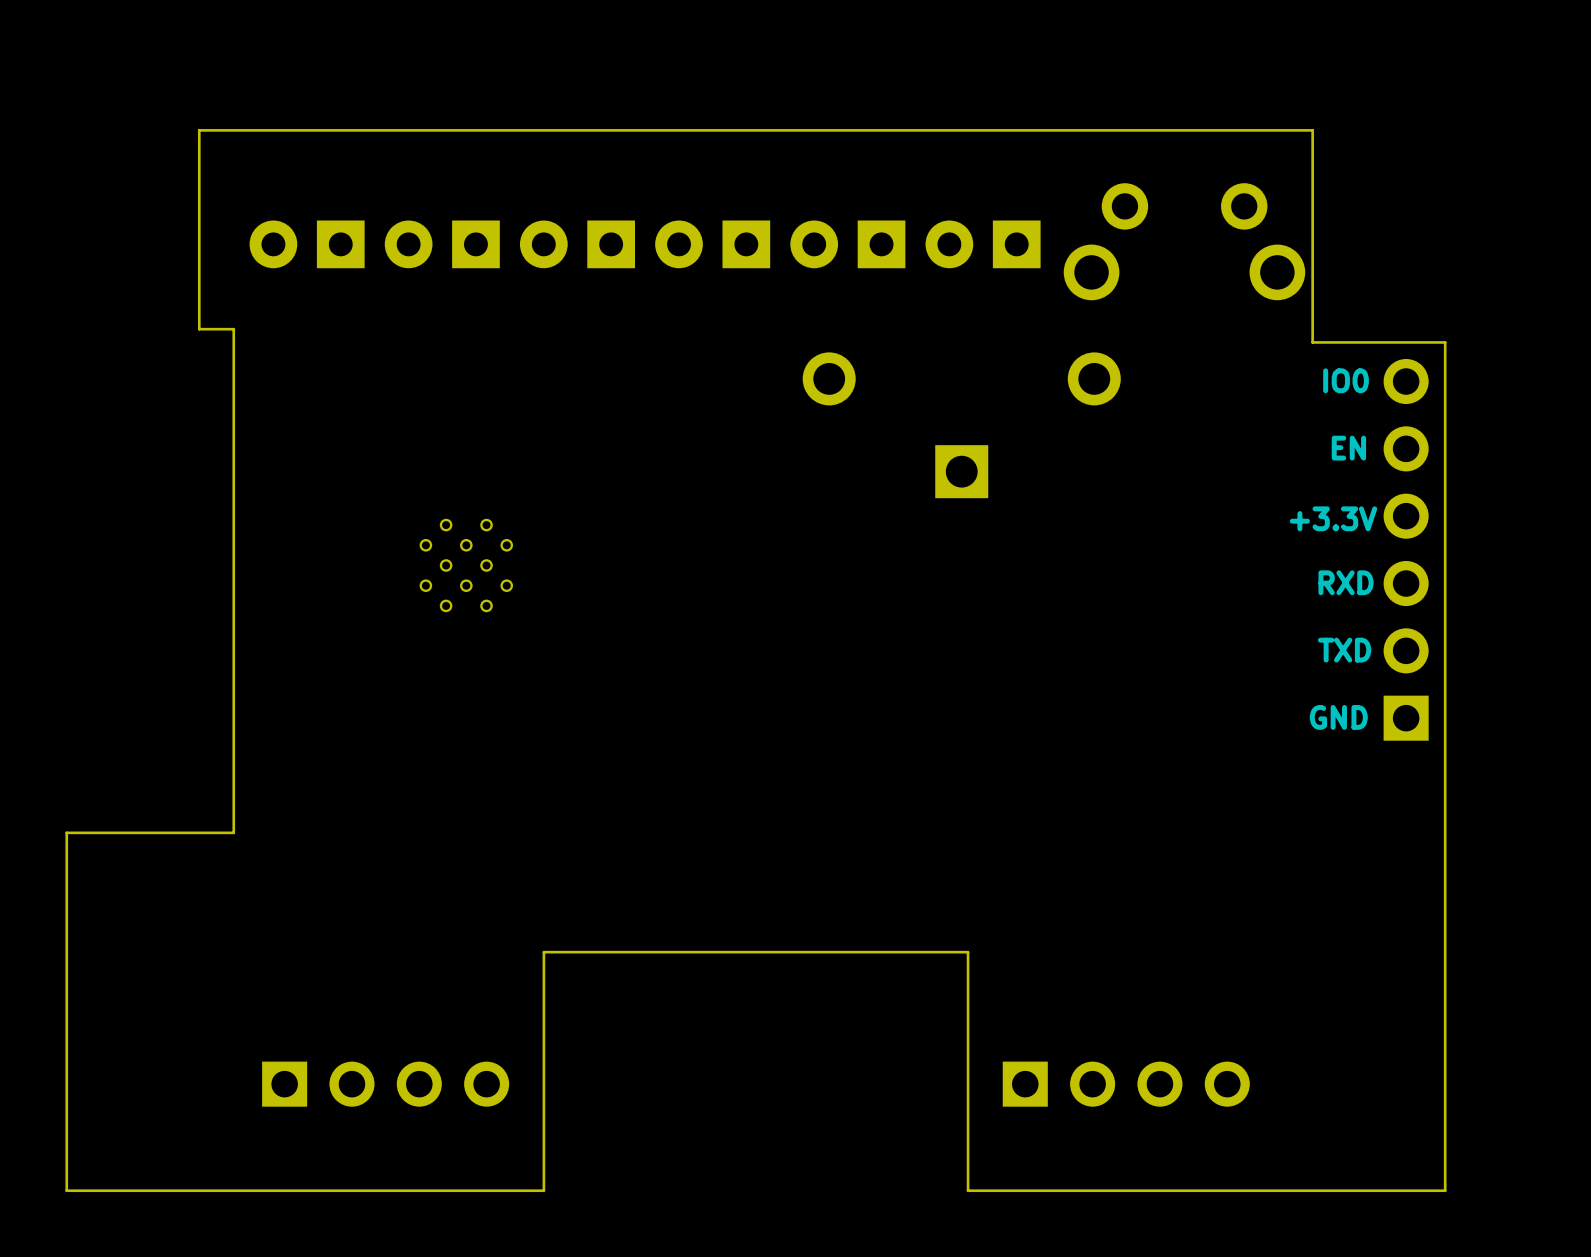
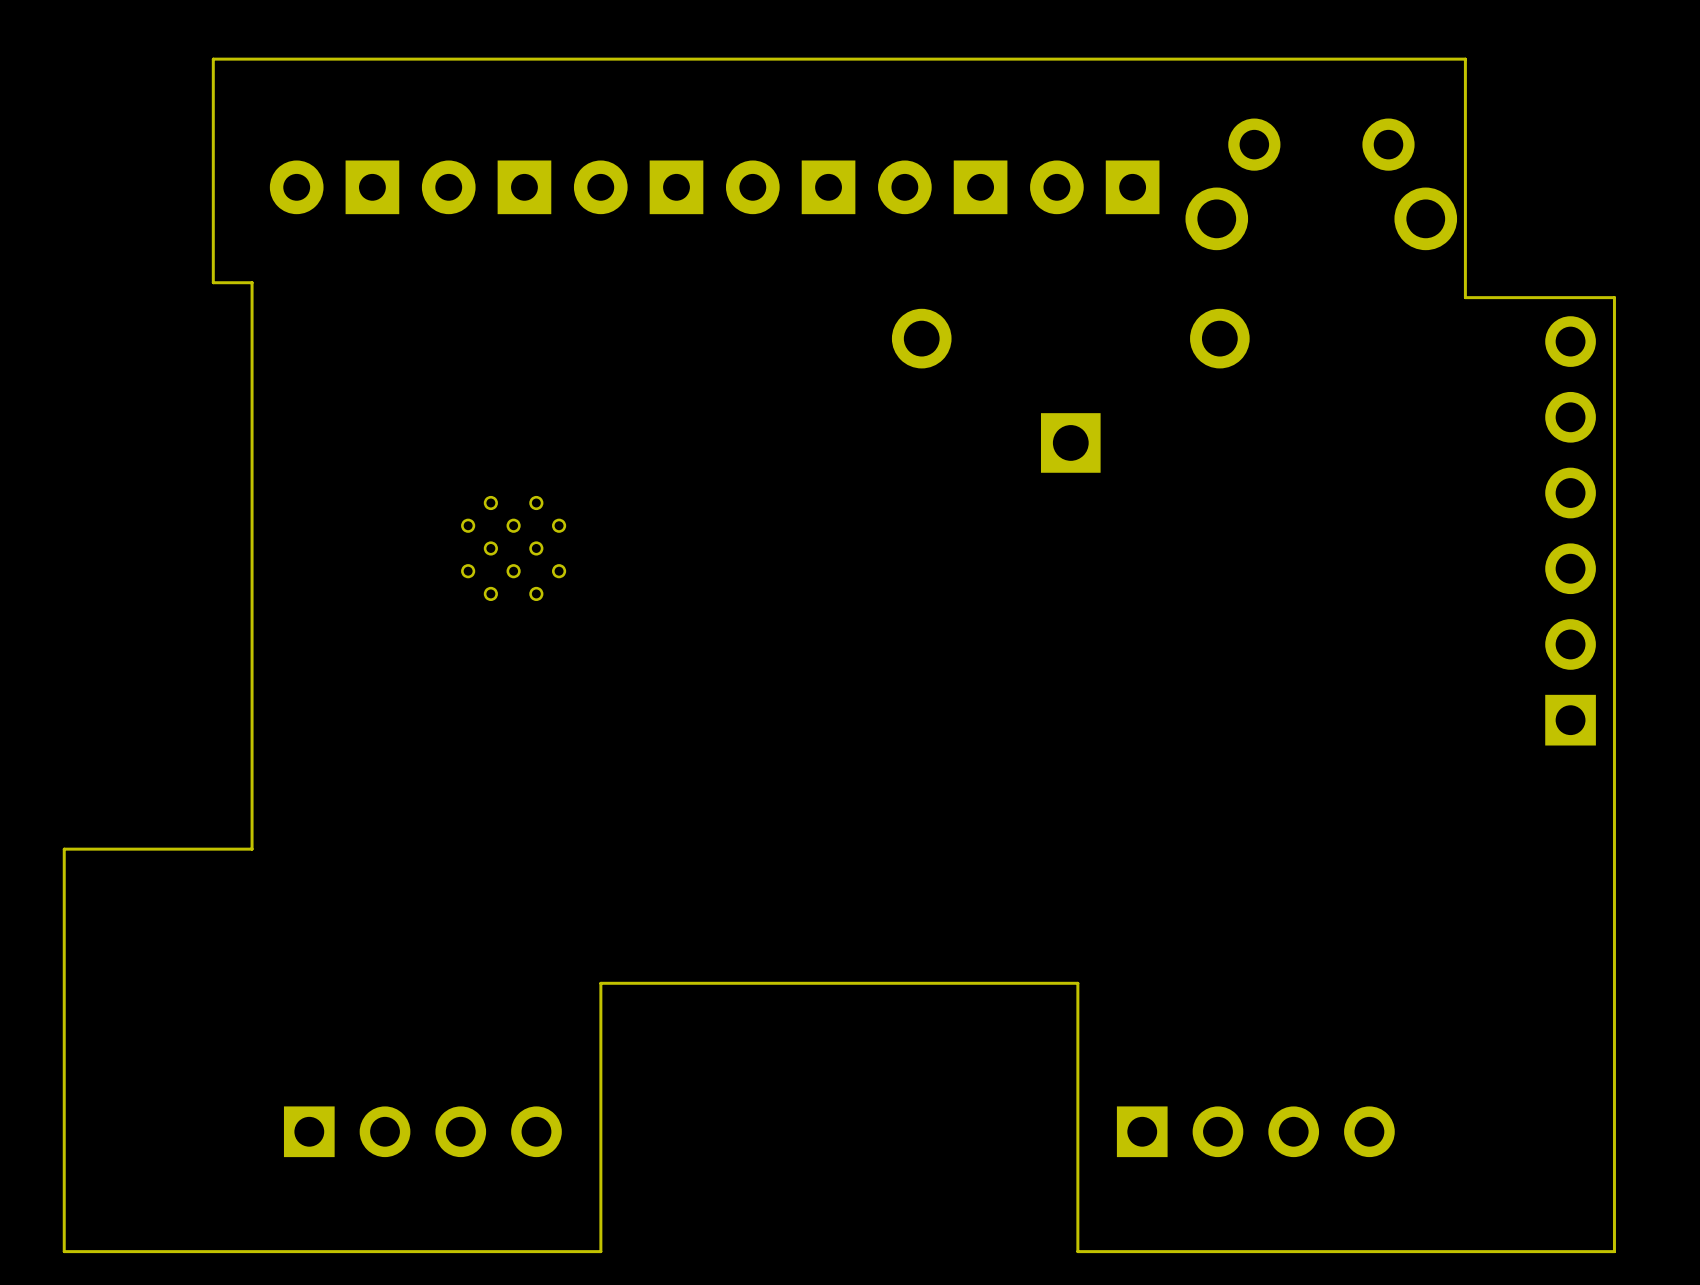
text: IO0 (1346, 380) -> none
text: EN (1348, 448) -> none
text: +3.3V (1333, 518) -> none
text: RXD (1346, 582) -> none
text: TXD (1344, 650) -> none
text: GND (1338, 717) -> none

